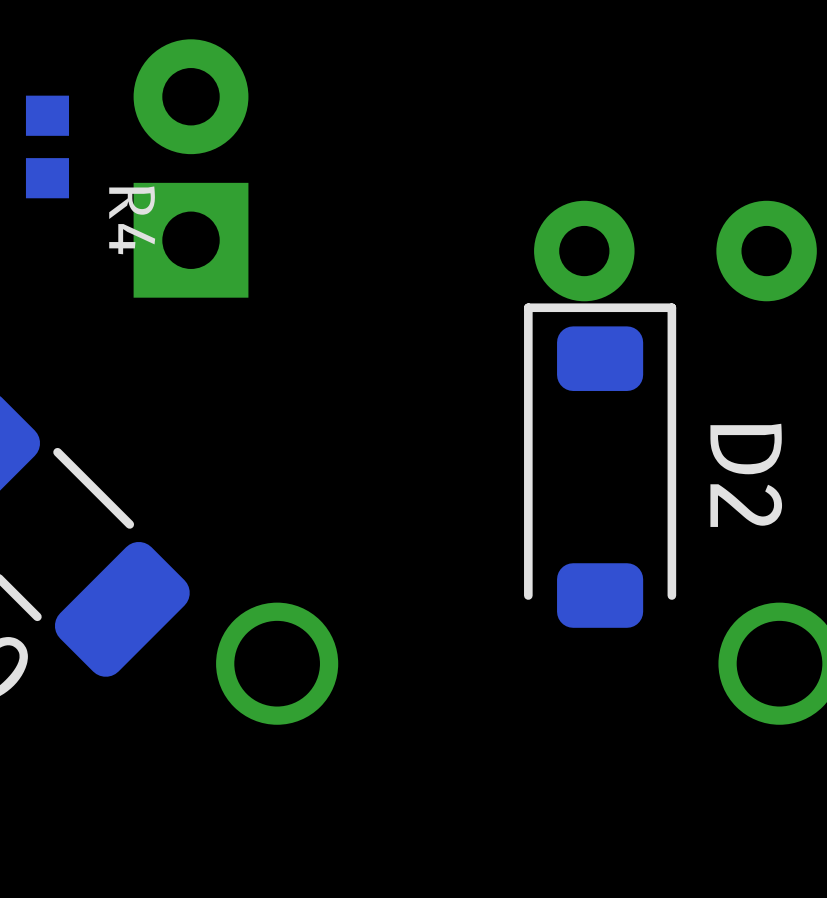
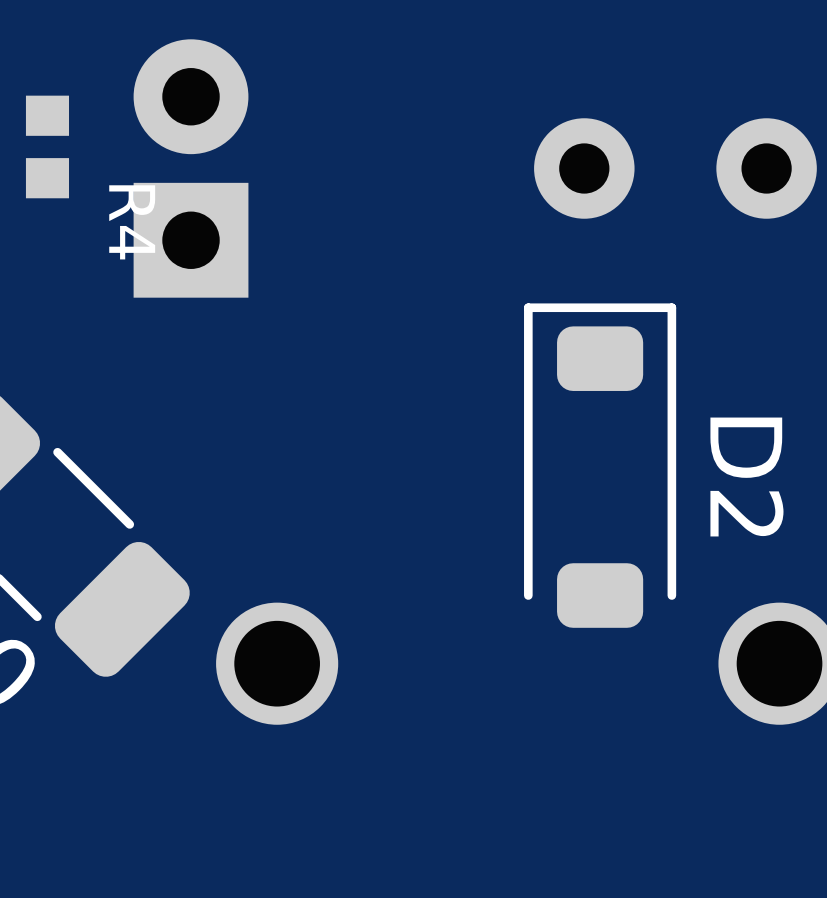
part position: (675, 251) -> (675, 168)

